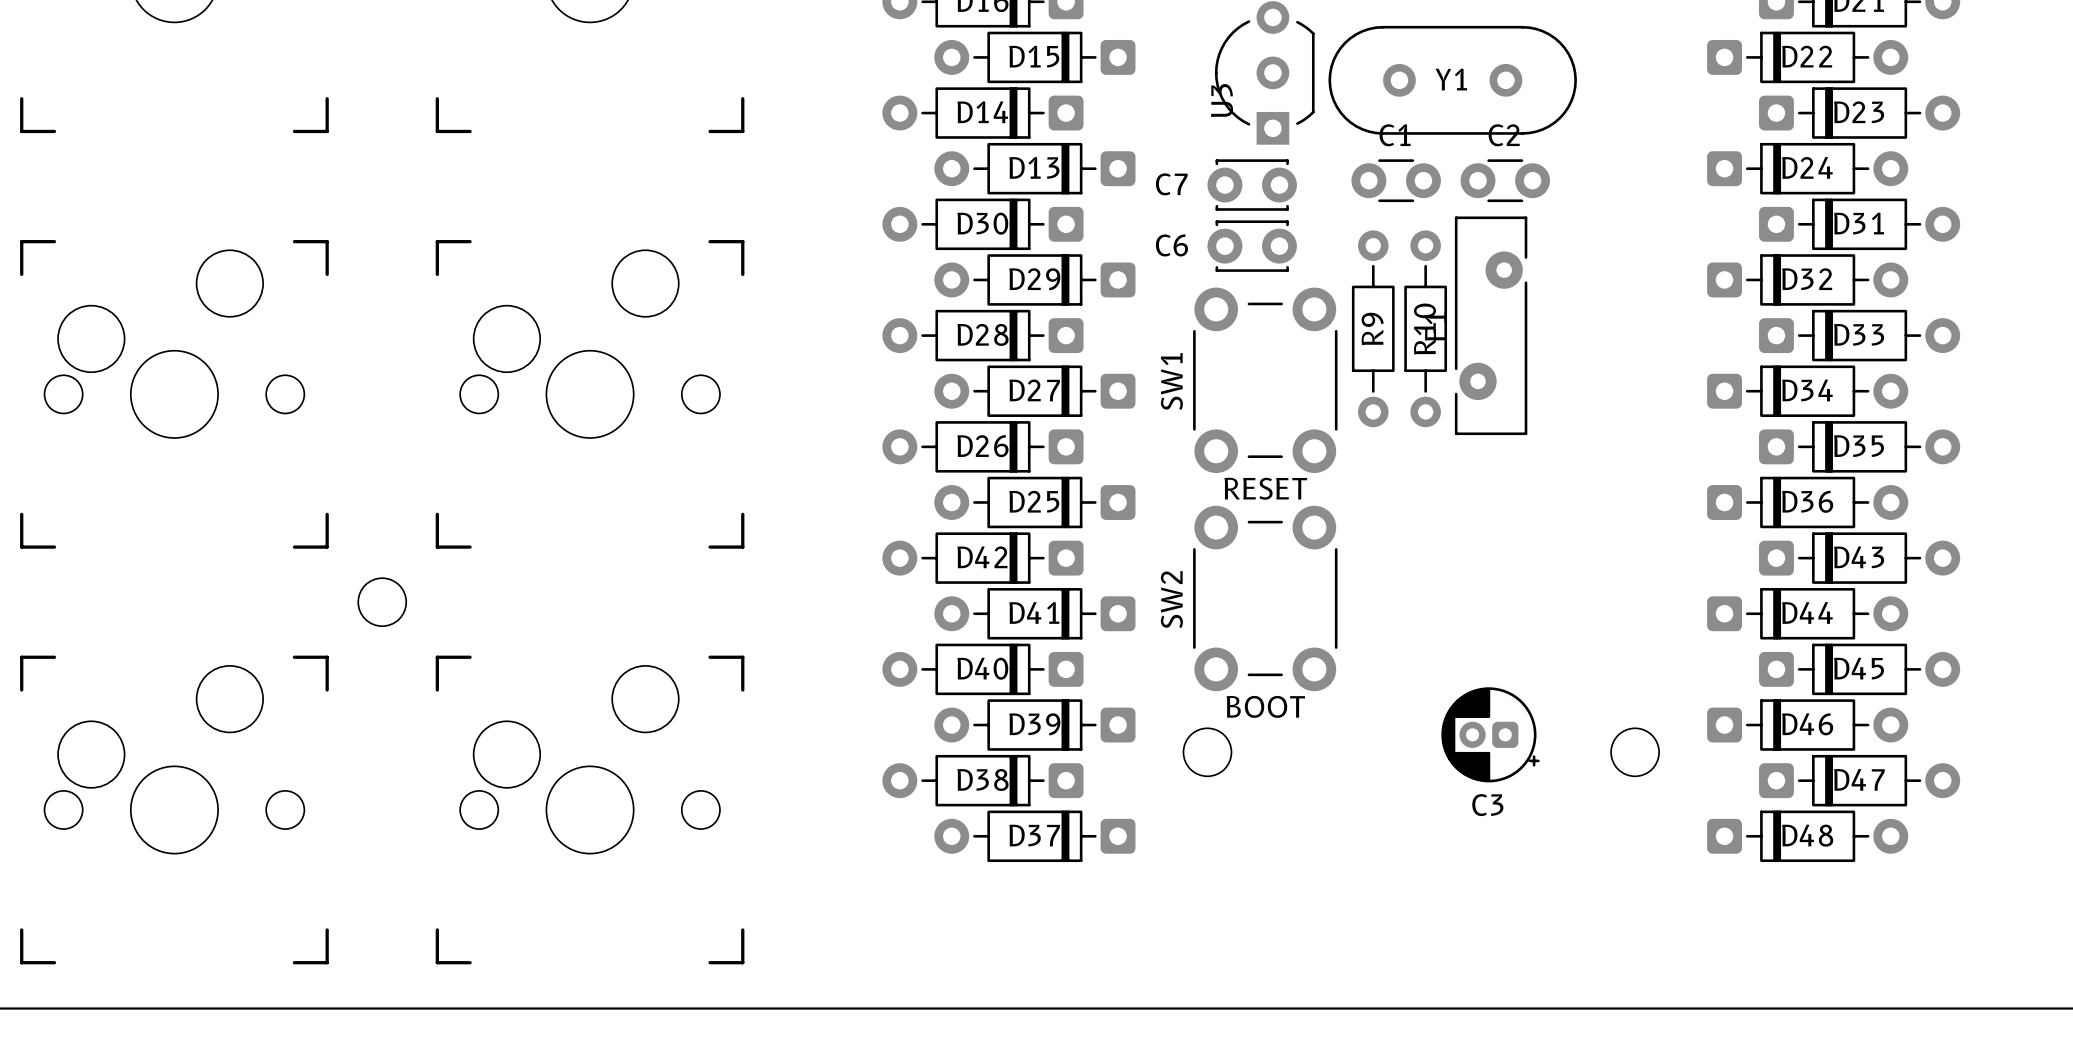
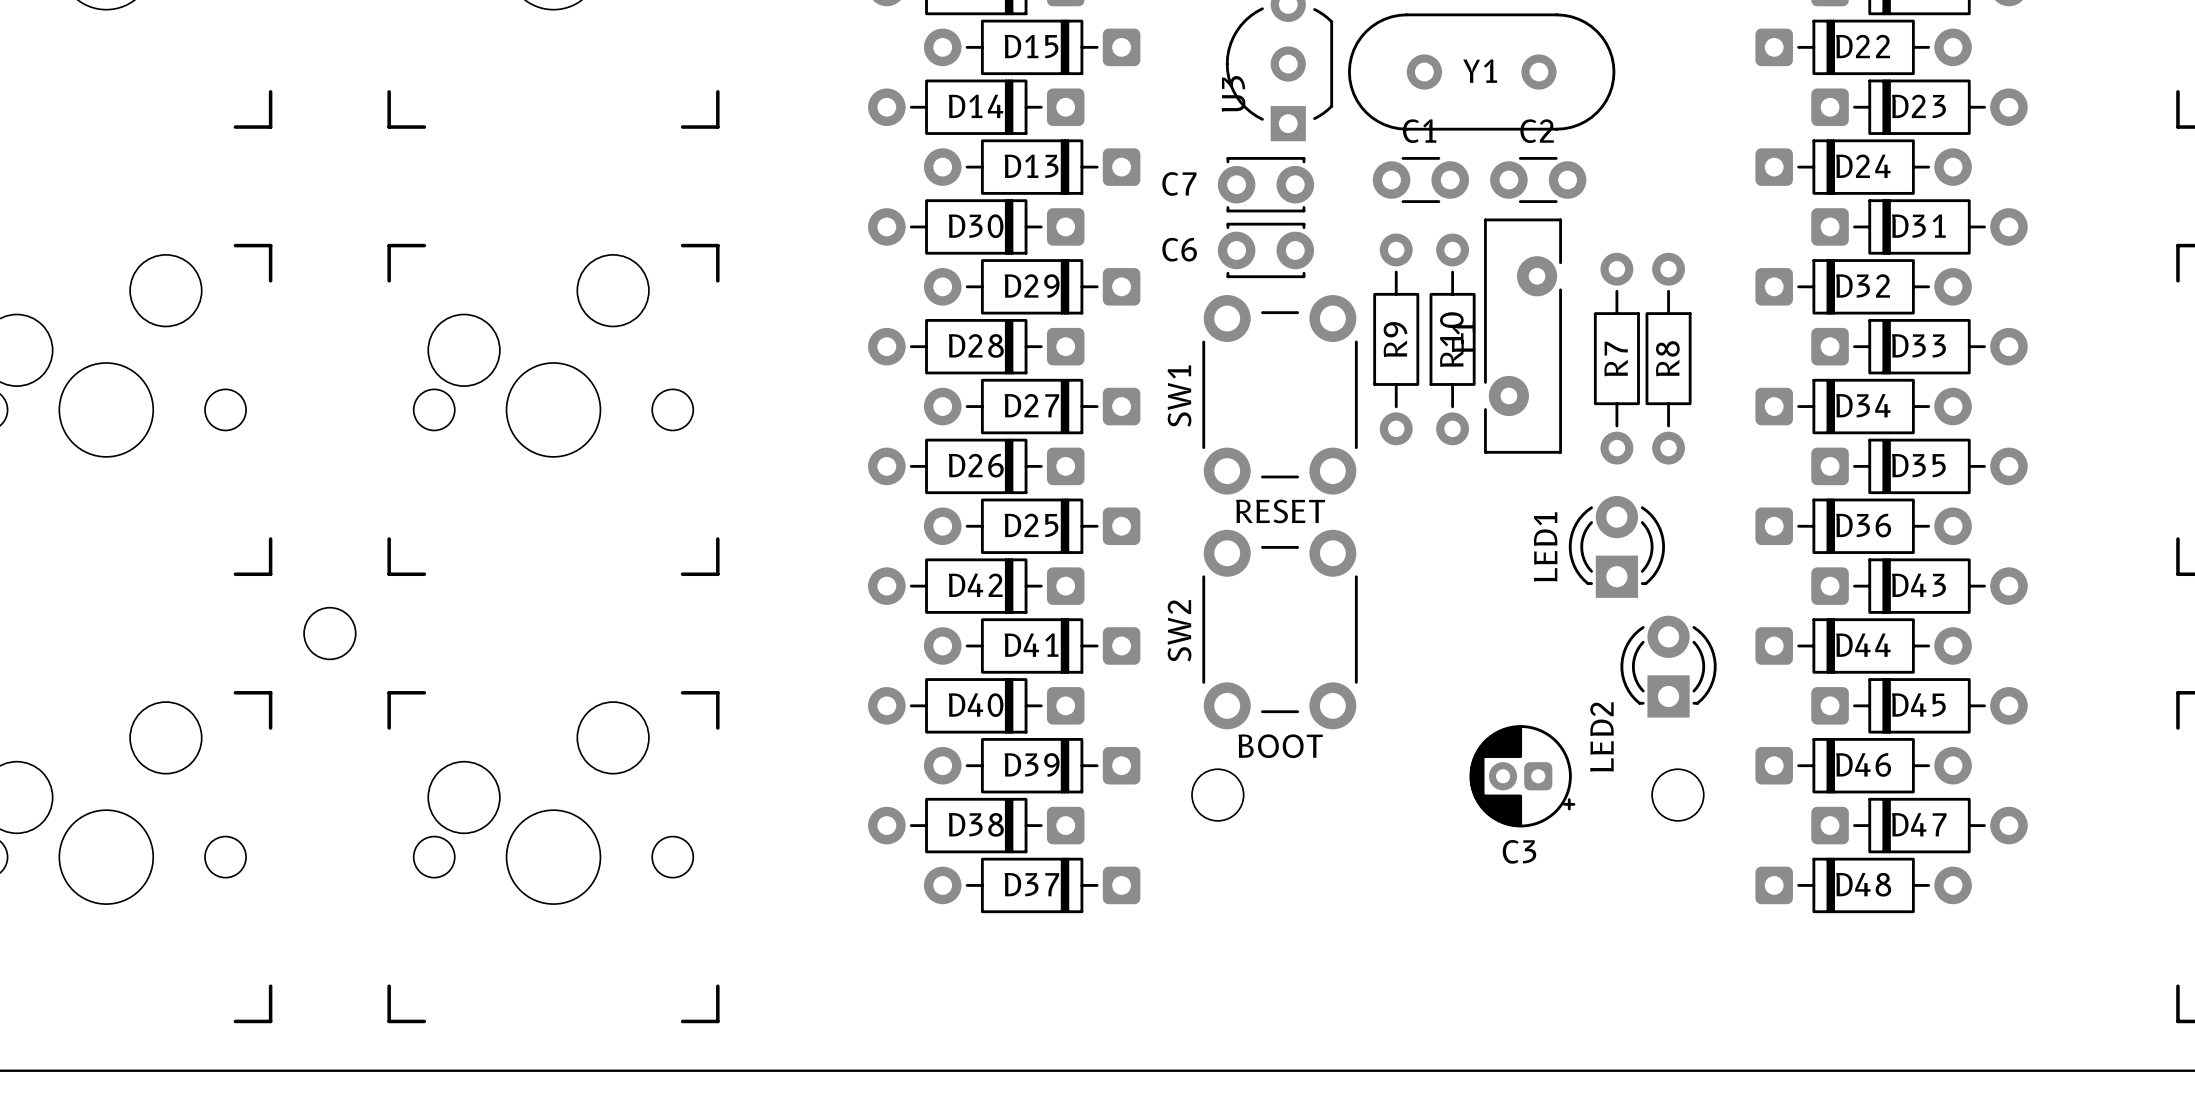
R7: none -> (1616, 358)
R8: none -> (1668, 358)
LED1: none -> (1616, 546)
LED2: none -> (1668, 666)

